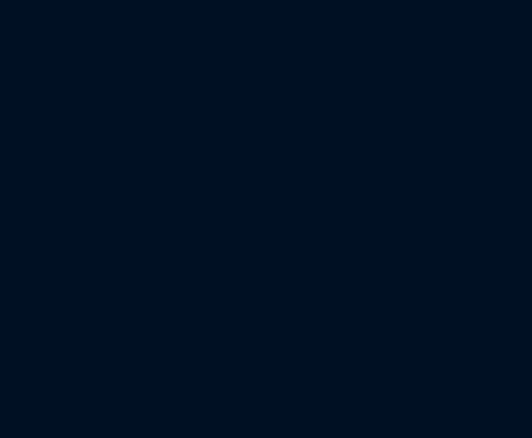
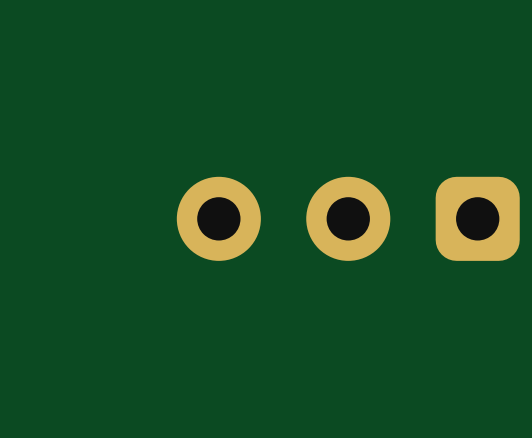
part: none -> (348, 218)

